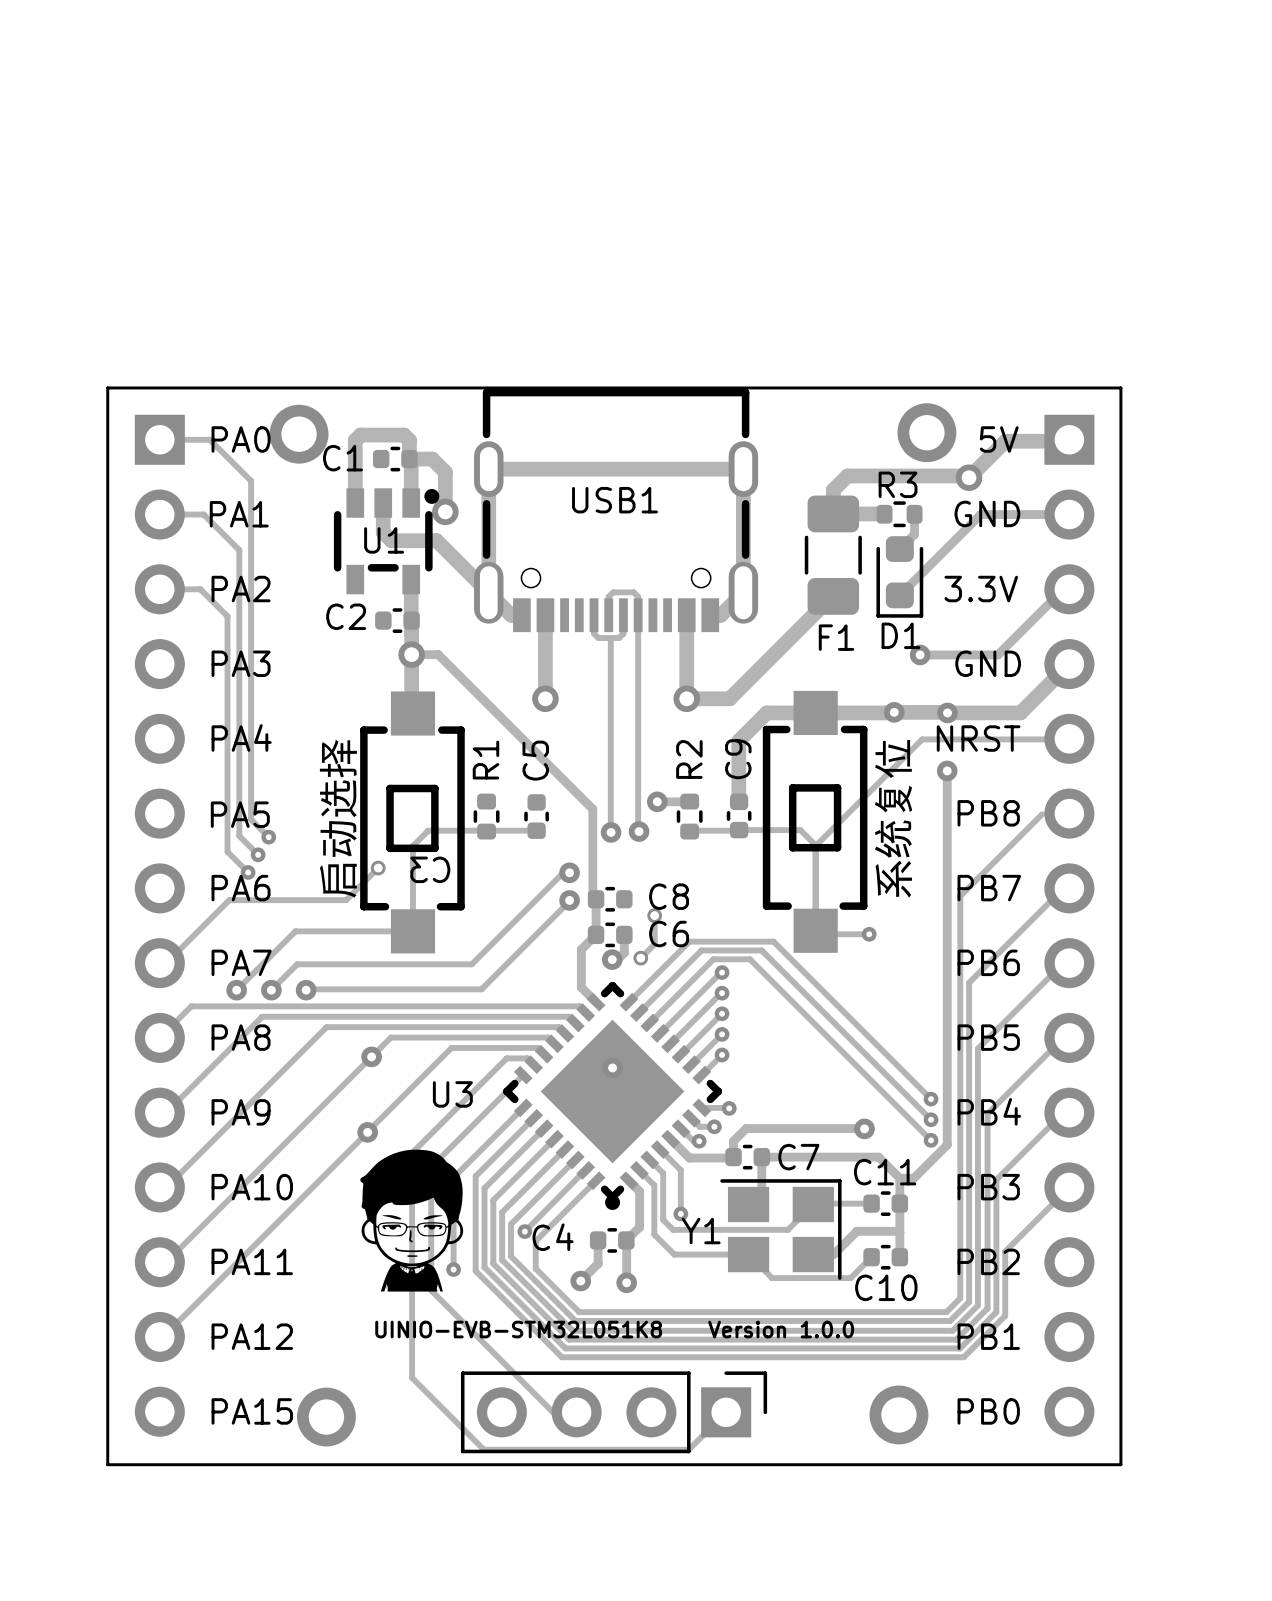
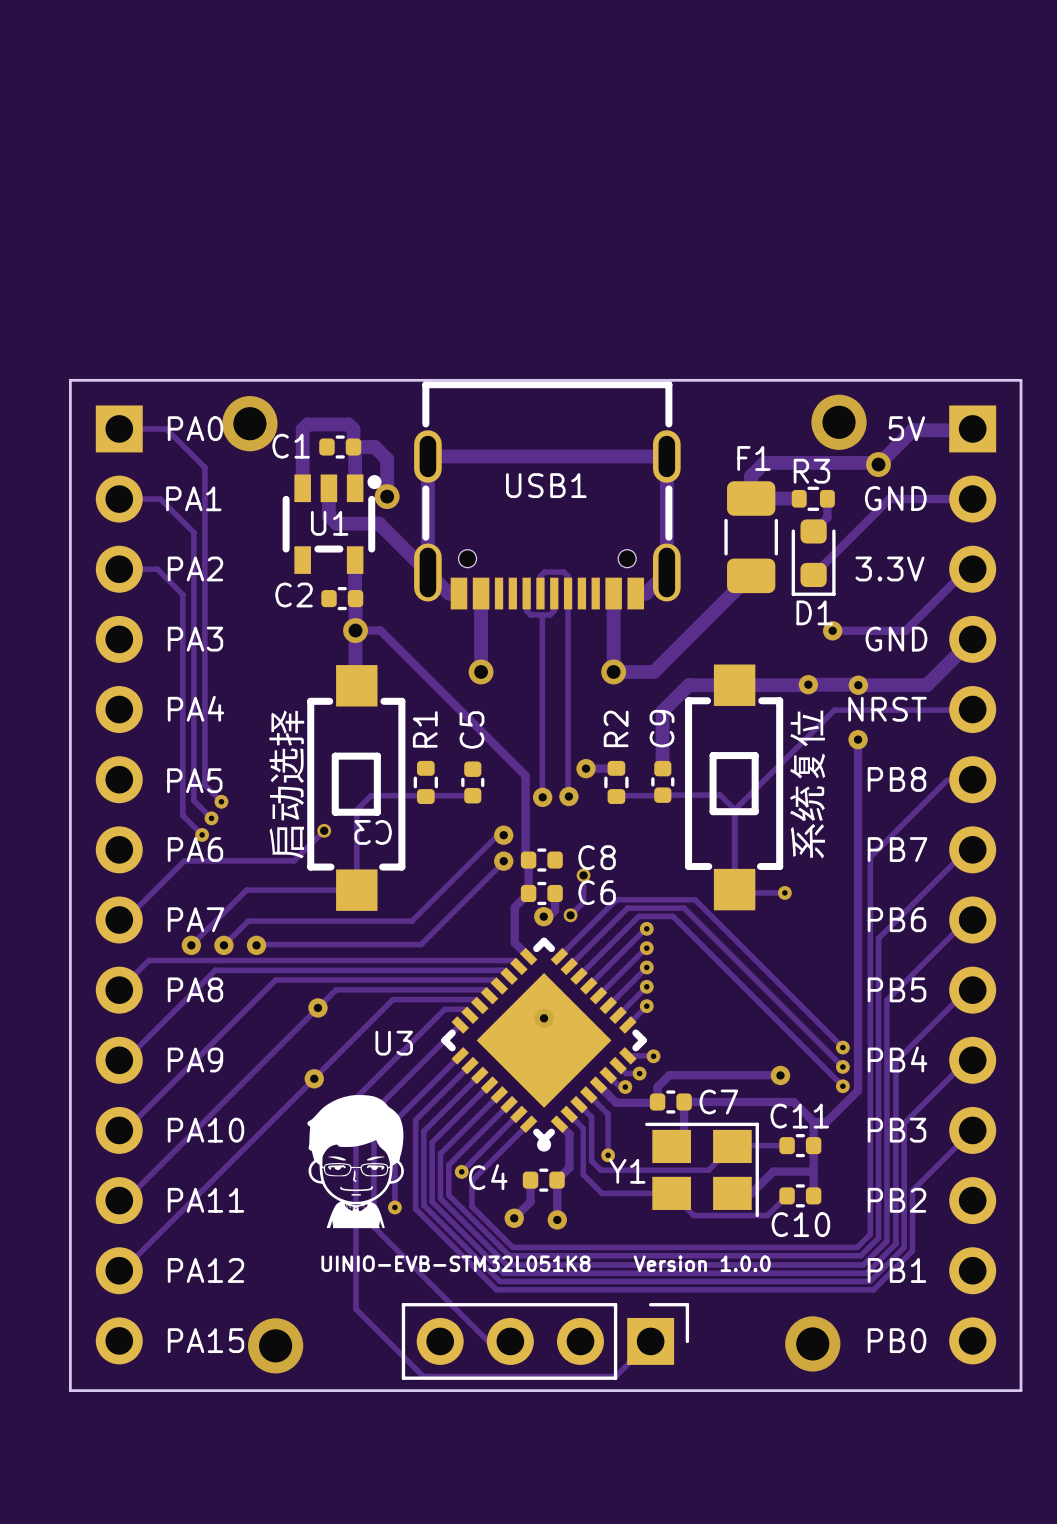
F1 name position: F1 (836, 637) -> F1 (753, 458)

